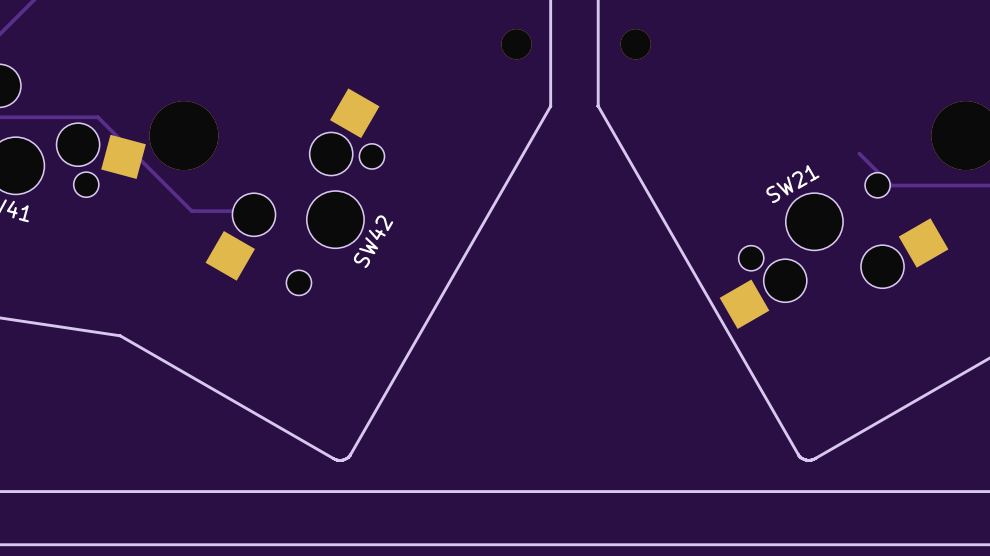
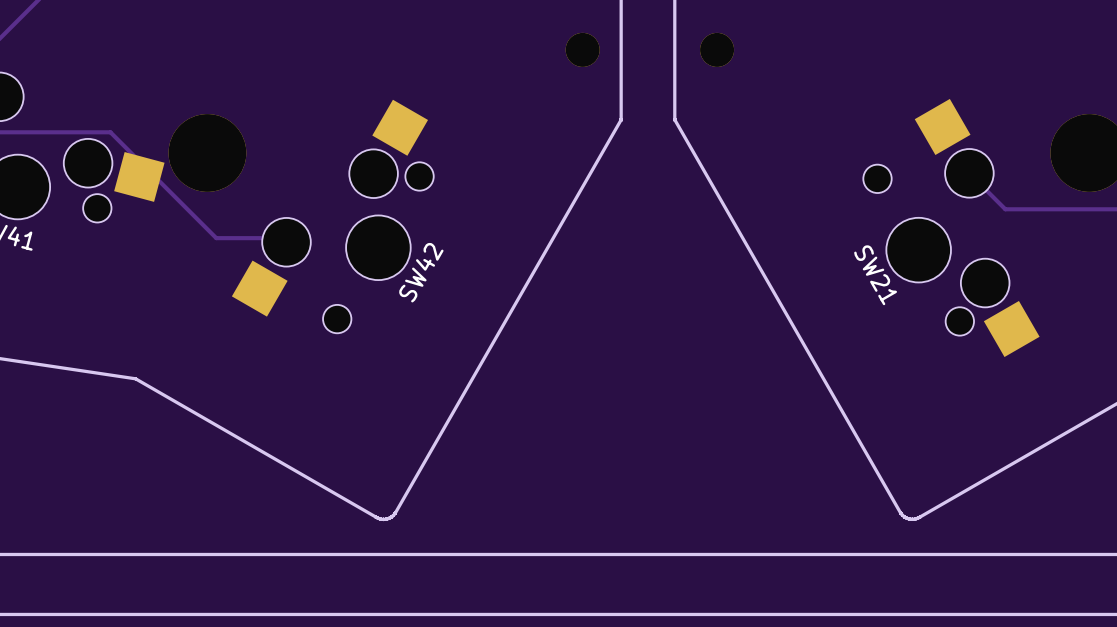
SW21 rotation: 0° (834, 250) -> 90° counterclockwise (951, 227)

